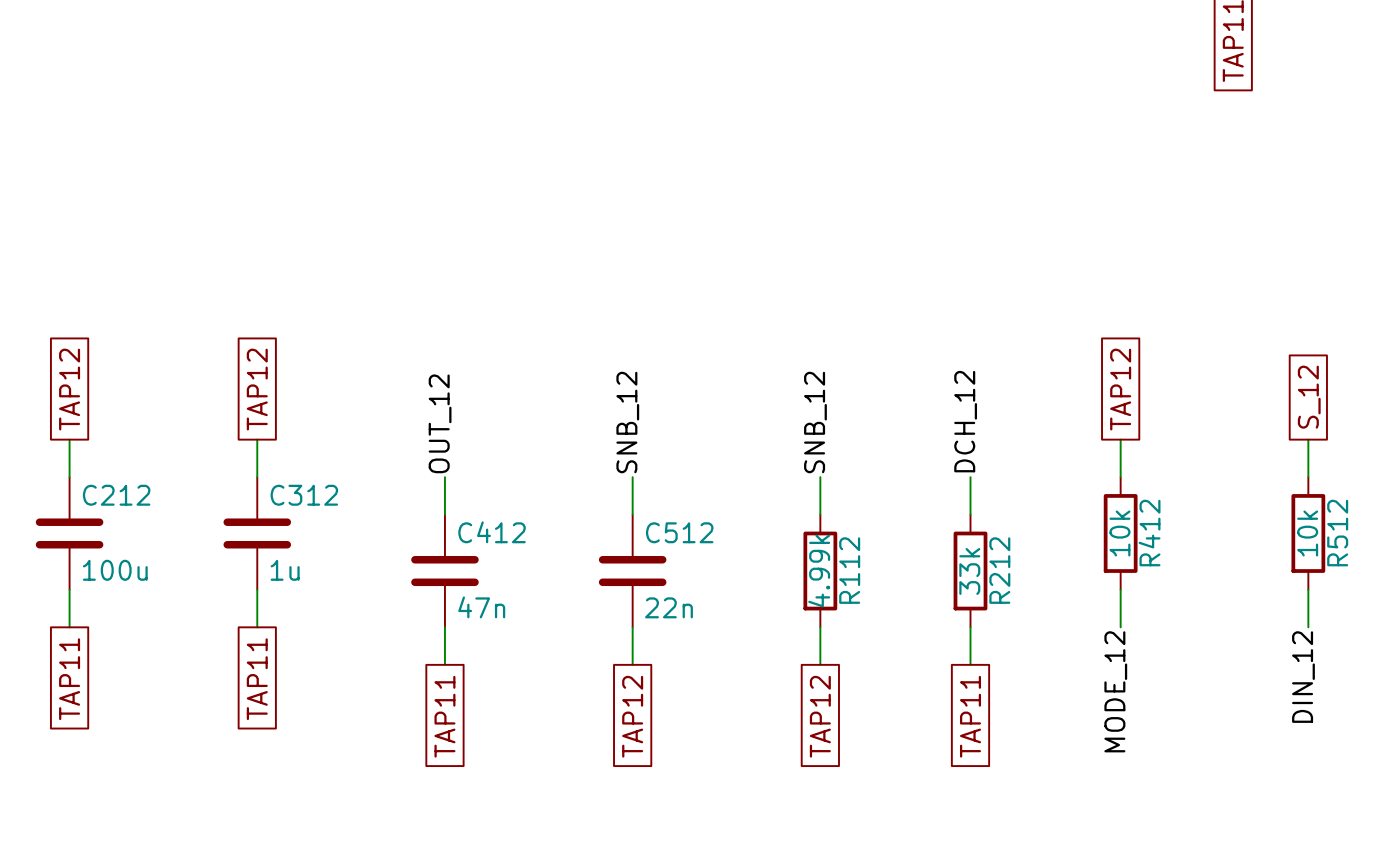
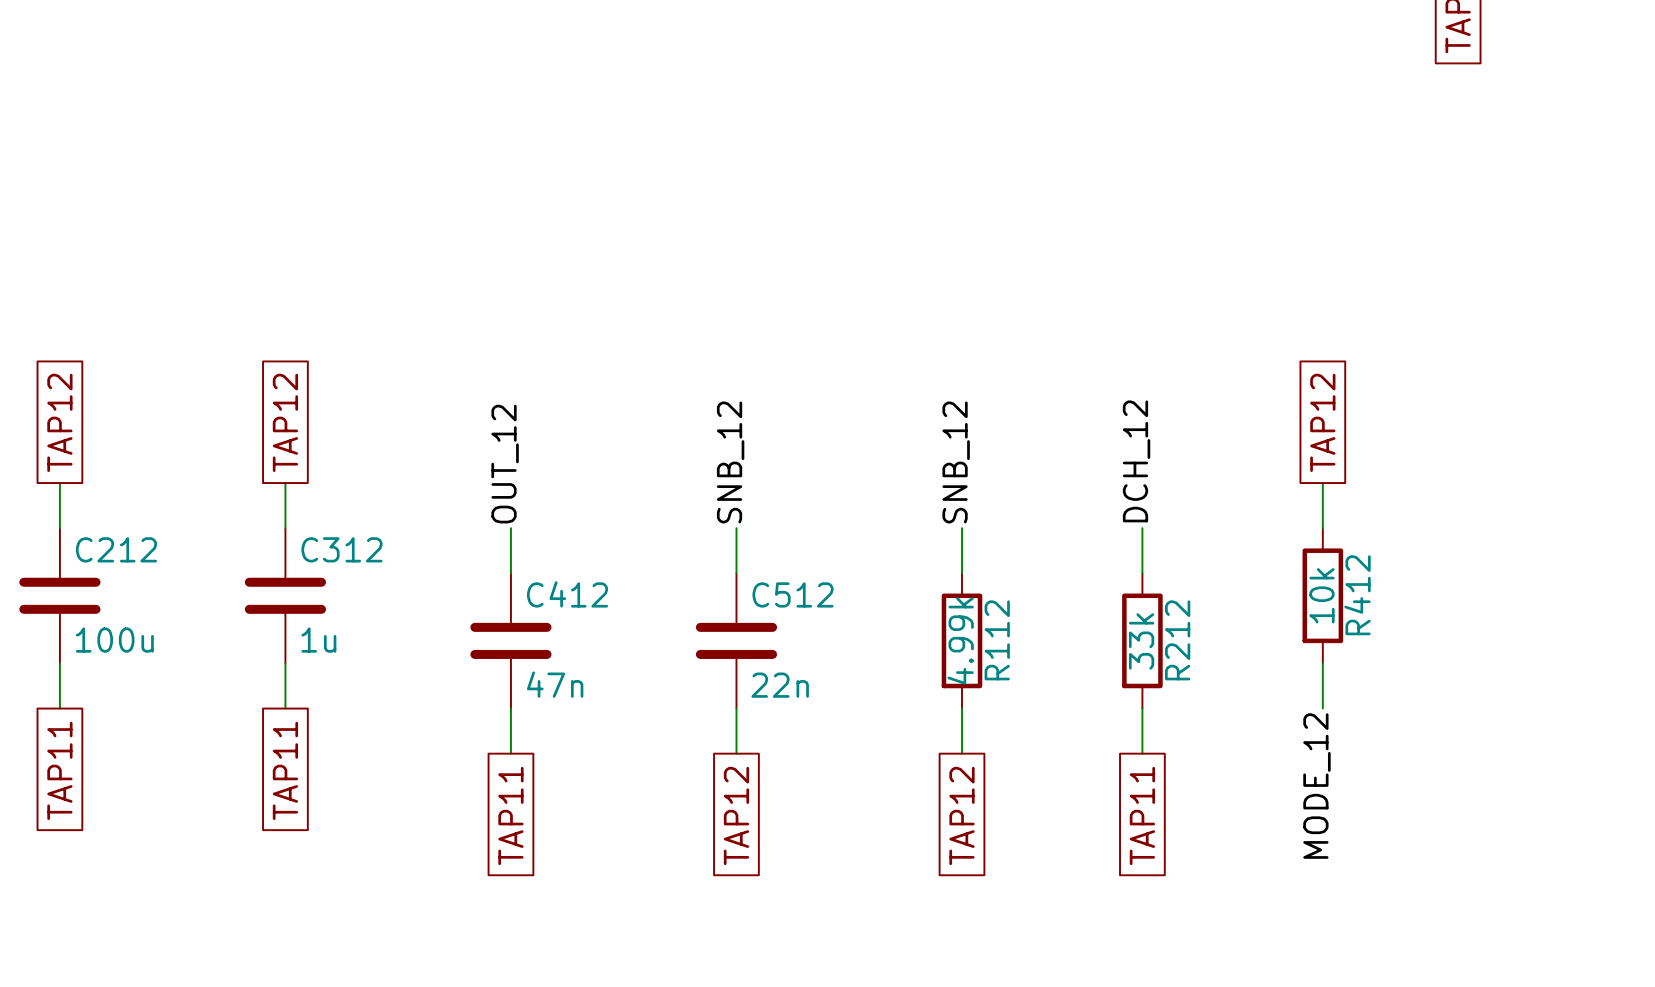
global label: S_12 (1309, 397) -> none
wire: (1308, 439) (1308, 477) -> none
R512: 10k (1308, 533) -> none
wire: (1308, 589) (1308, 627) -> none
label: DIN_12 (1303, 677) -> none

